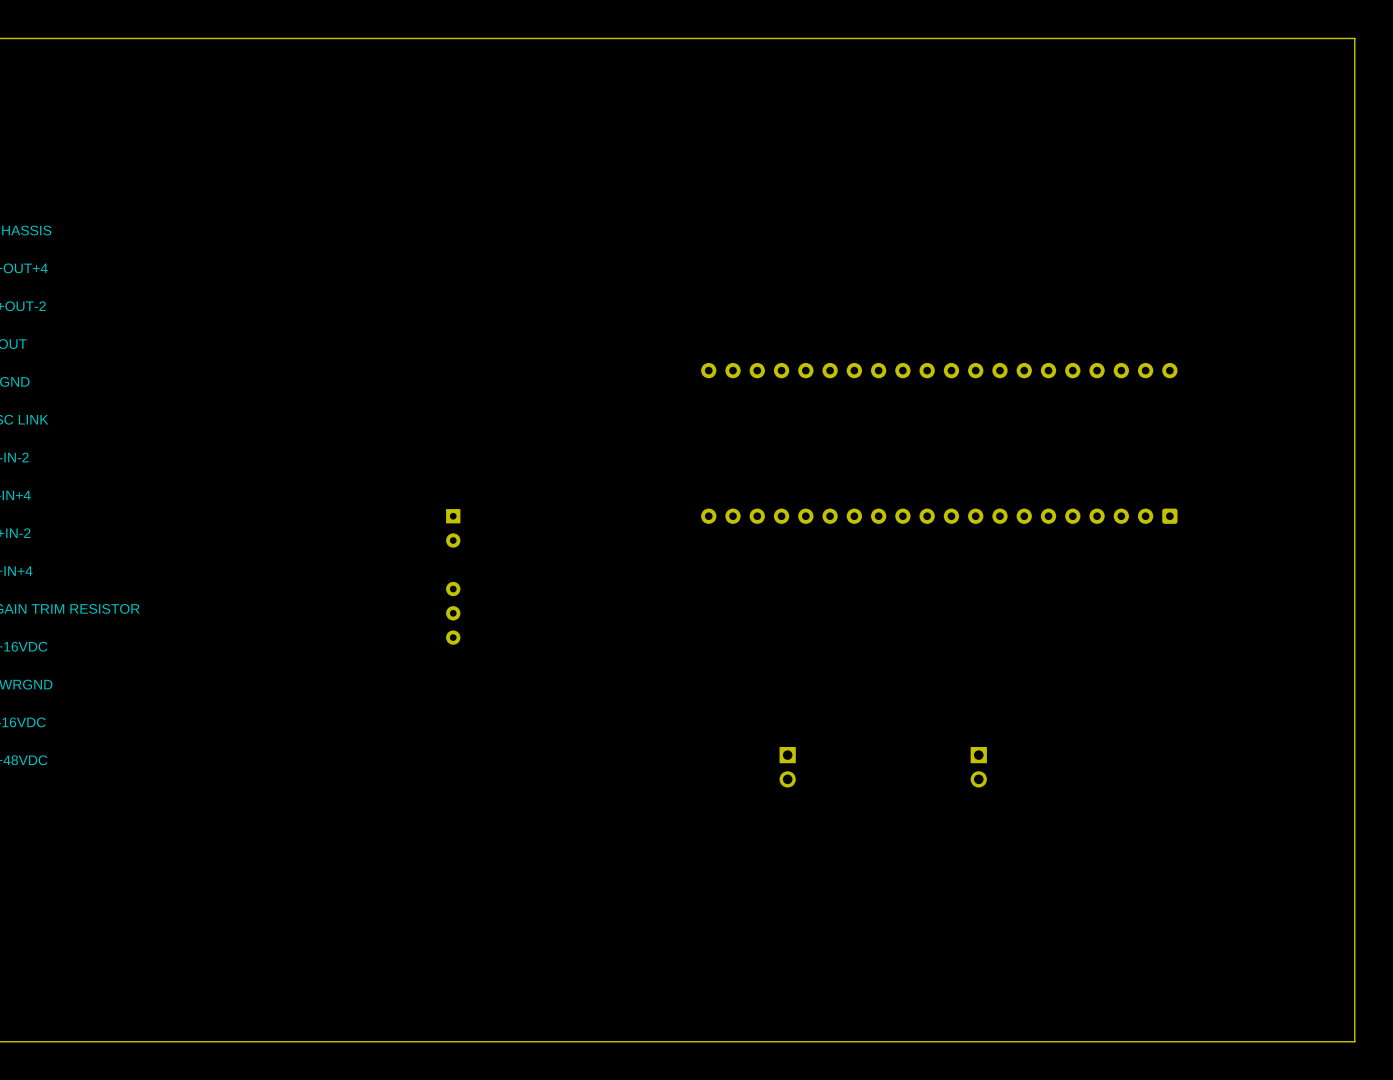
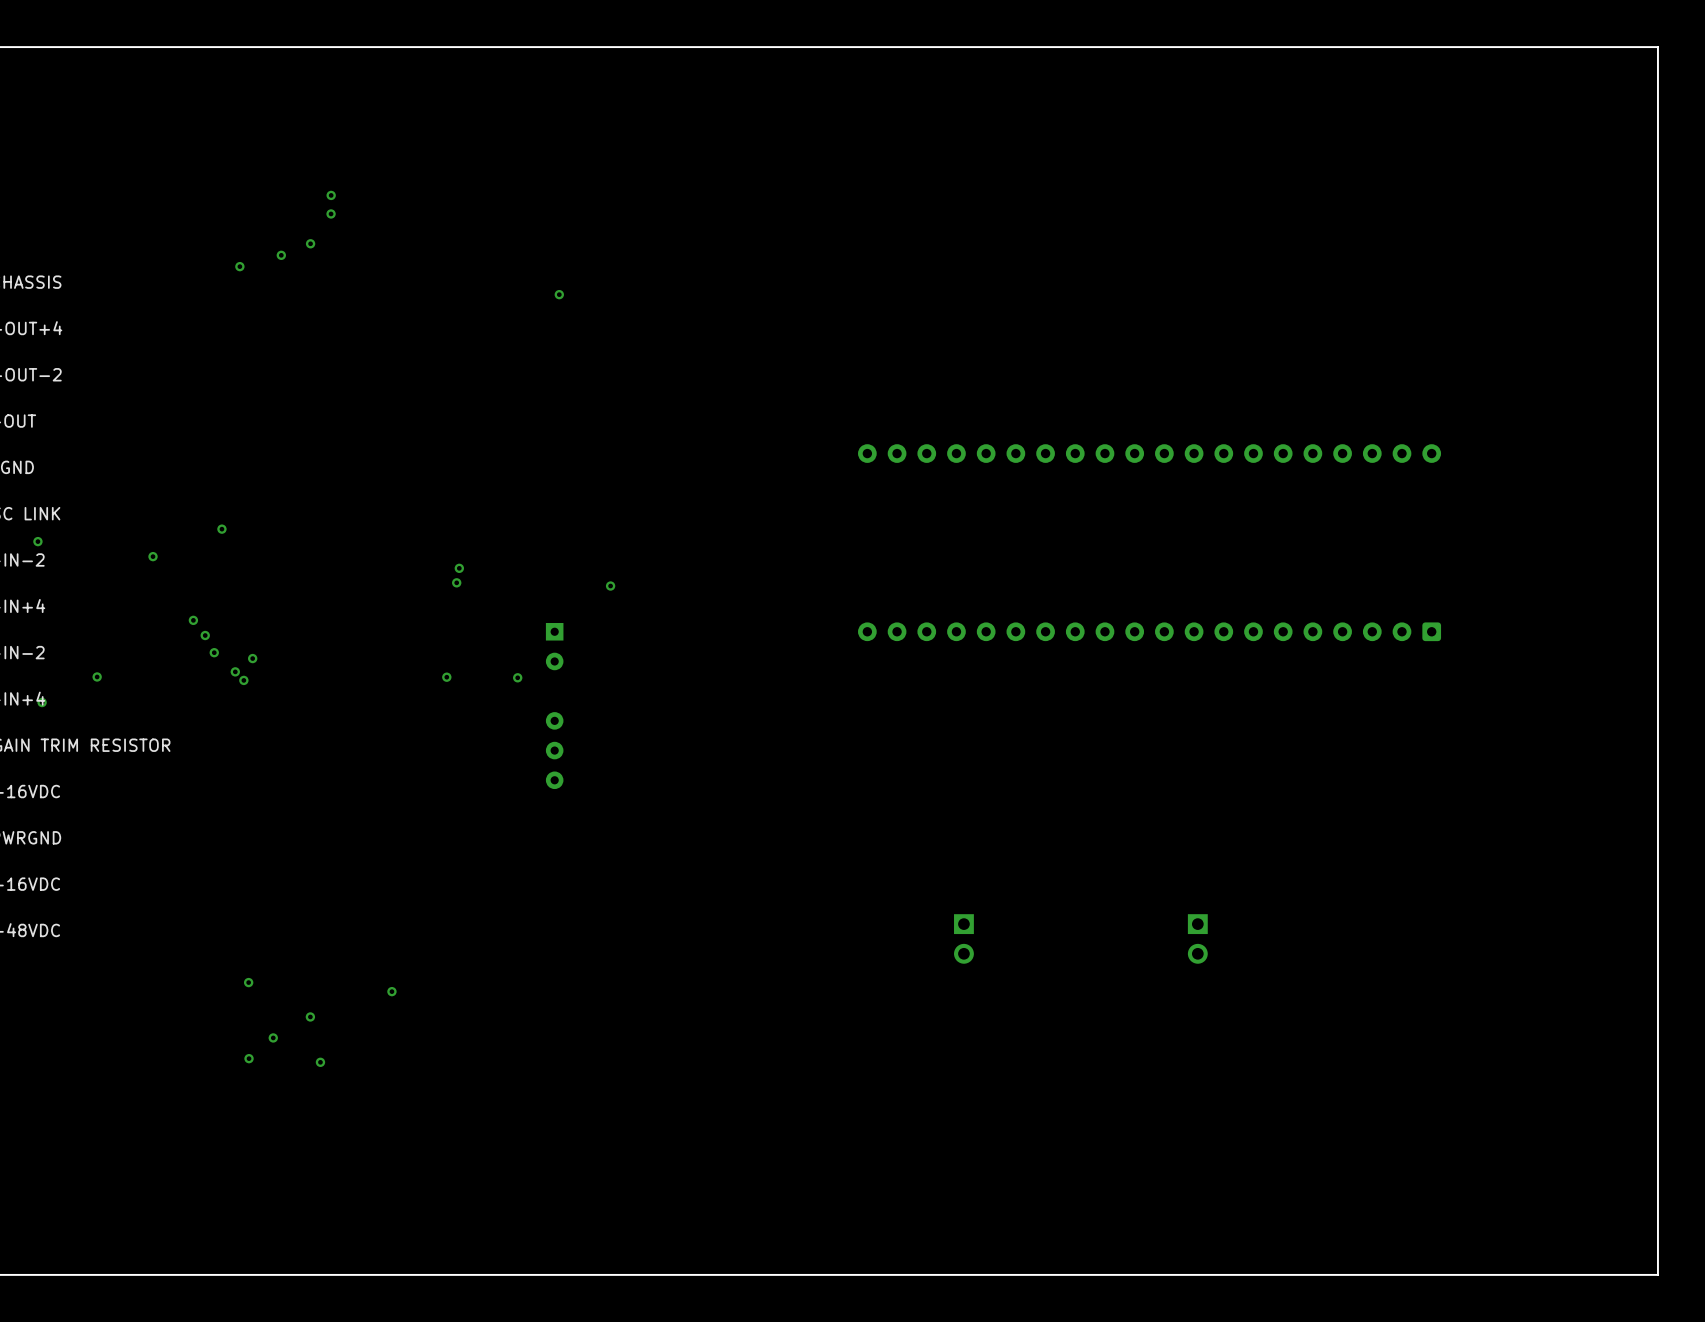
via: none -> (331, 195)
via: none -> (331, 213)
via: none -> (310, 243)
via: none -> (281, 255)
via: none -> (239, 266)
via: none -> (559, 294)
via: none -> (221, 529)
via: none -> (37, 541)
via: none -> (153, 556)
via: none -> (459, 568)
via: none -> (456, 582)
via: none -> (610, 586)
via: none -> (193, 620)
via: none -> (205, 635)
via: none -> (214, 652)
via: none -> (252, 658)
via: none -> (235, 671)
via: none -> (97, 676)
via: none -> (446, 677)
via: none -> (517, 677)
via: none -> (243, 680)
via: none -> (42, 702)
via: none -> (248, 982)
via: none -> (391, 991)
via: none -> (310, 1016)
via: none -> (273, 1037)
via: none -> (249, 1058)
via: none -> (320, 1062)

